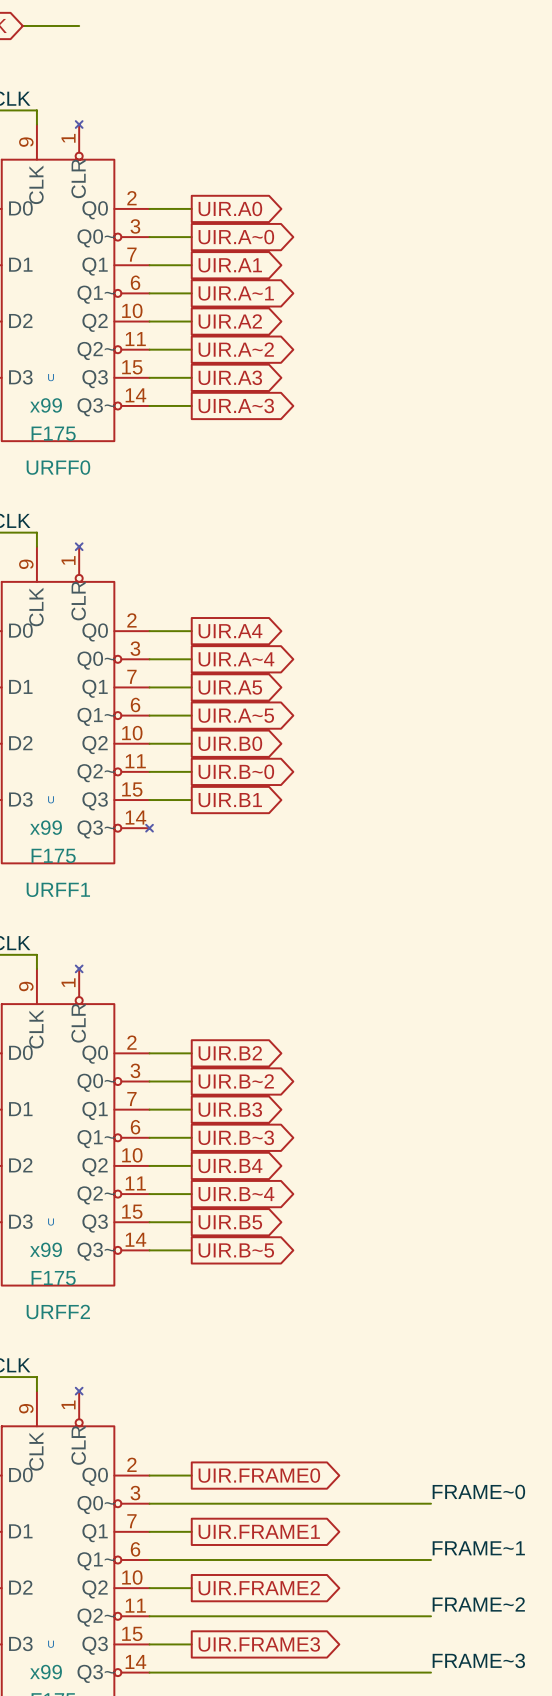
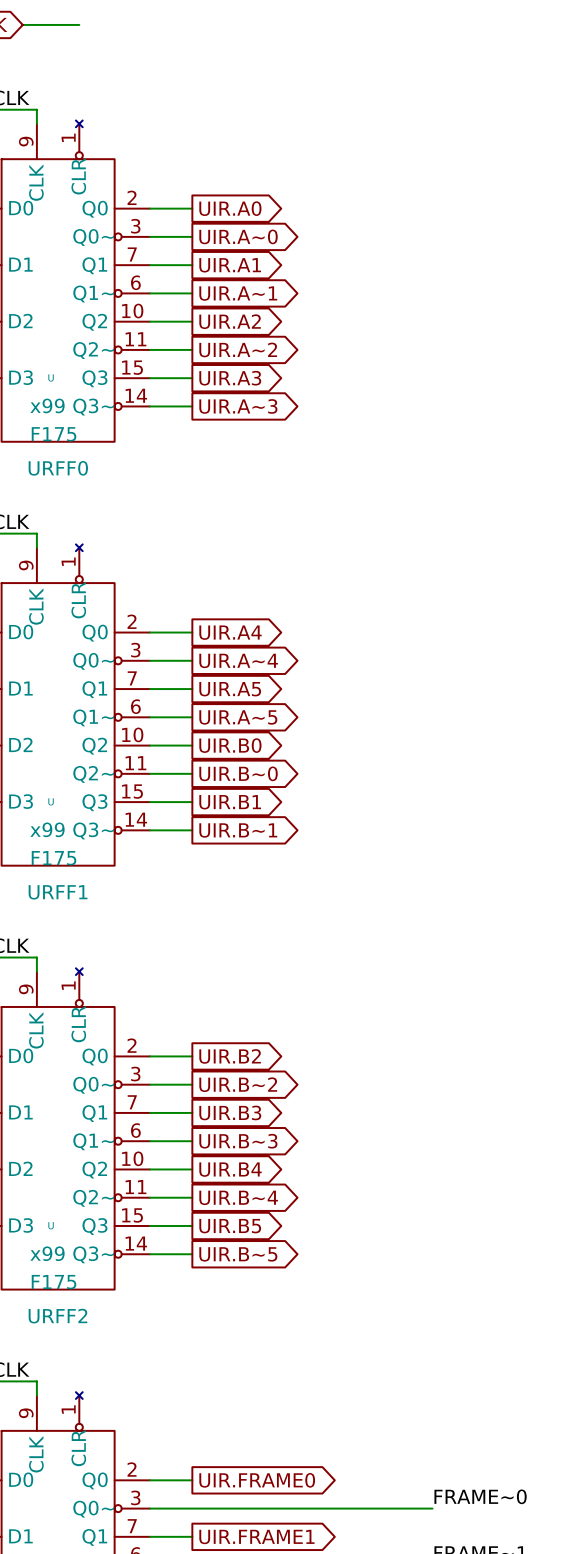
wire: none -> (149, 830) (192, 830)
no-connect mark: (149, 828) -> none
global label: none -> UIR.B~1 (238, 830)

